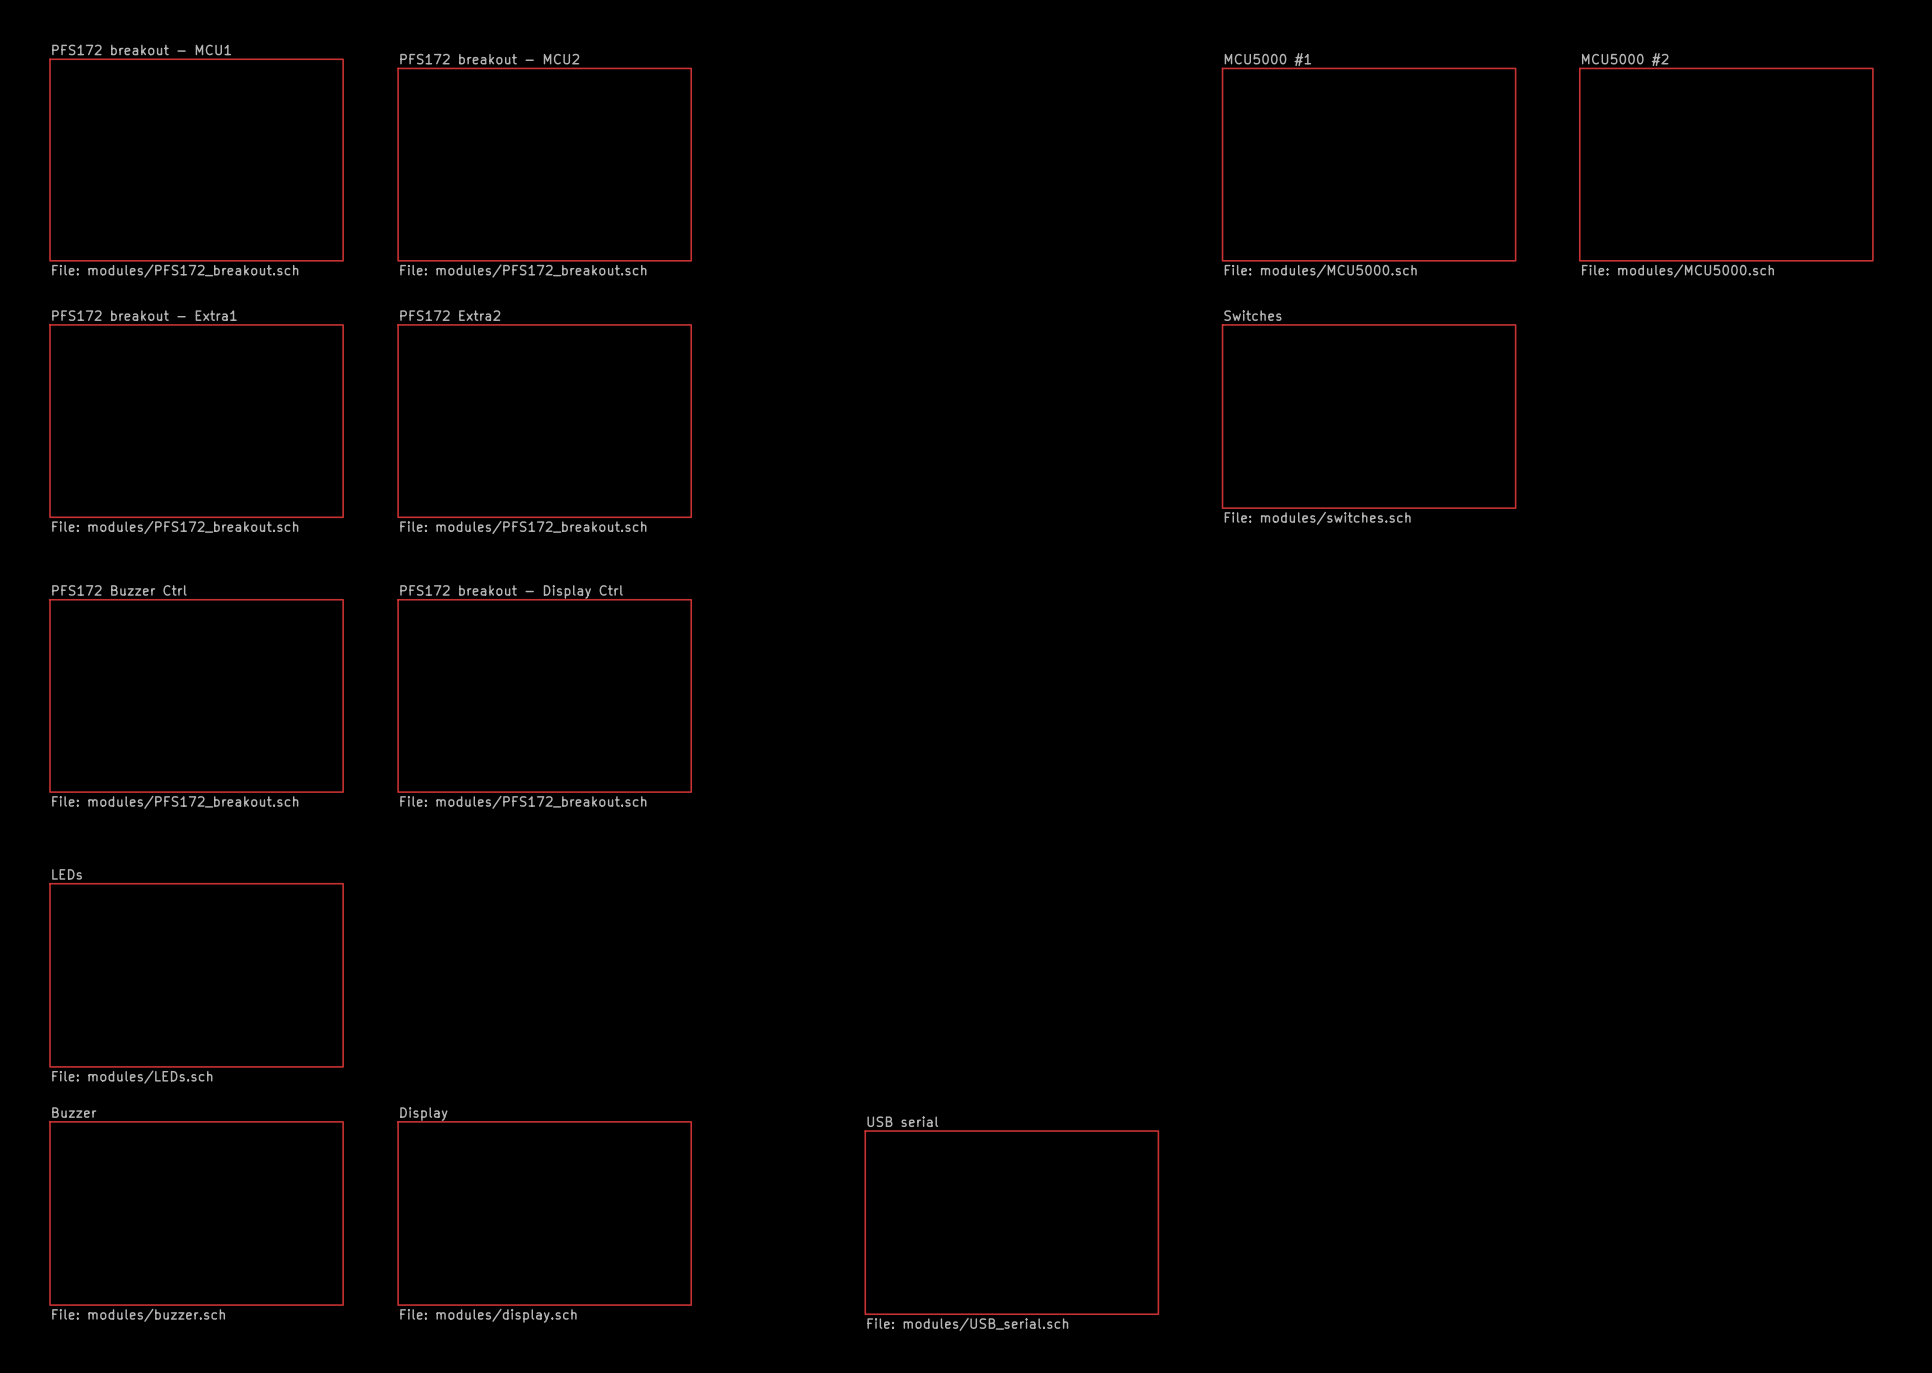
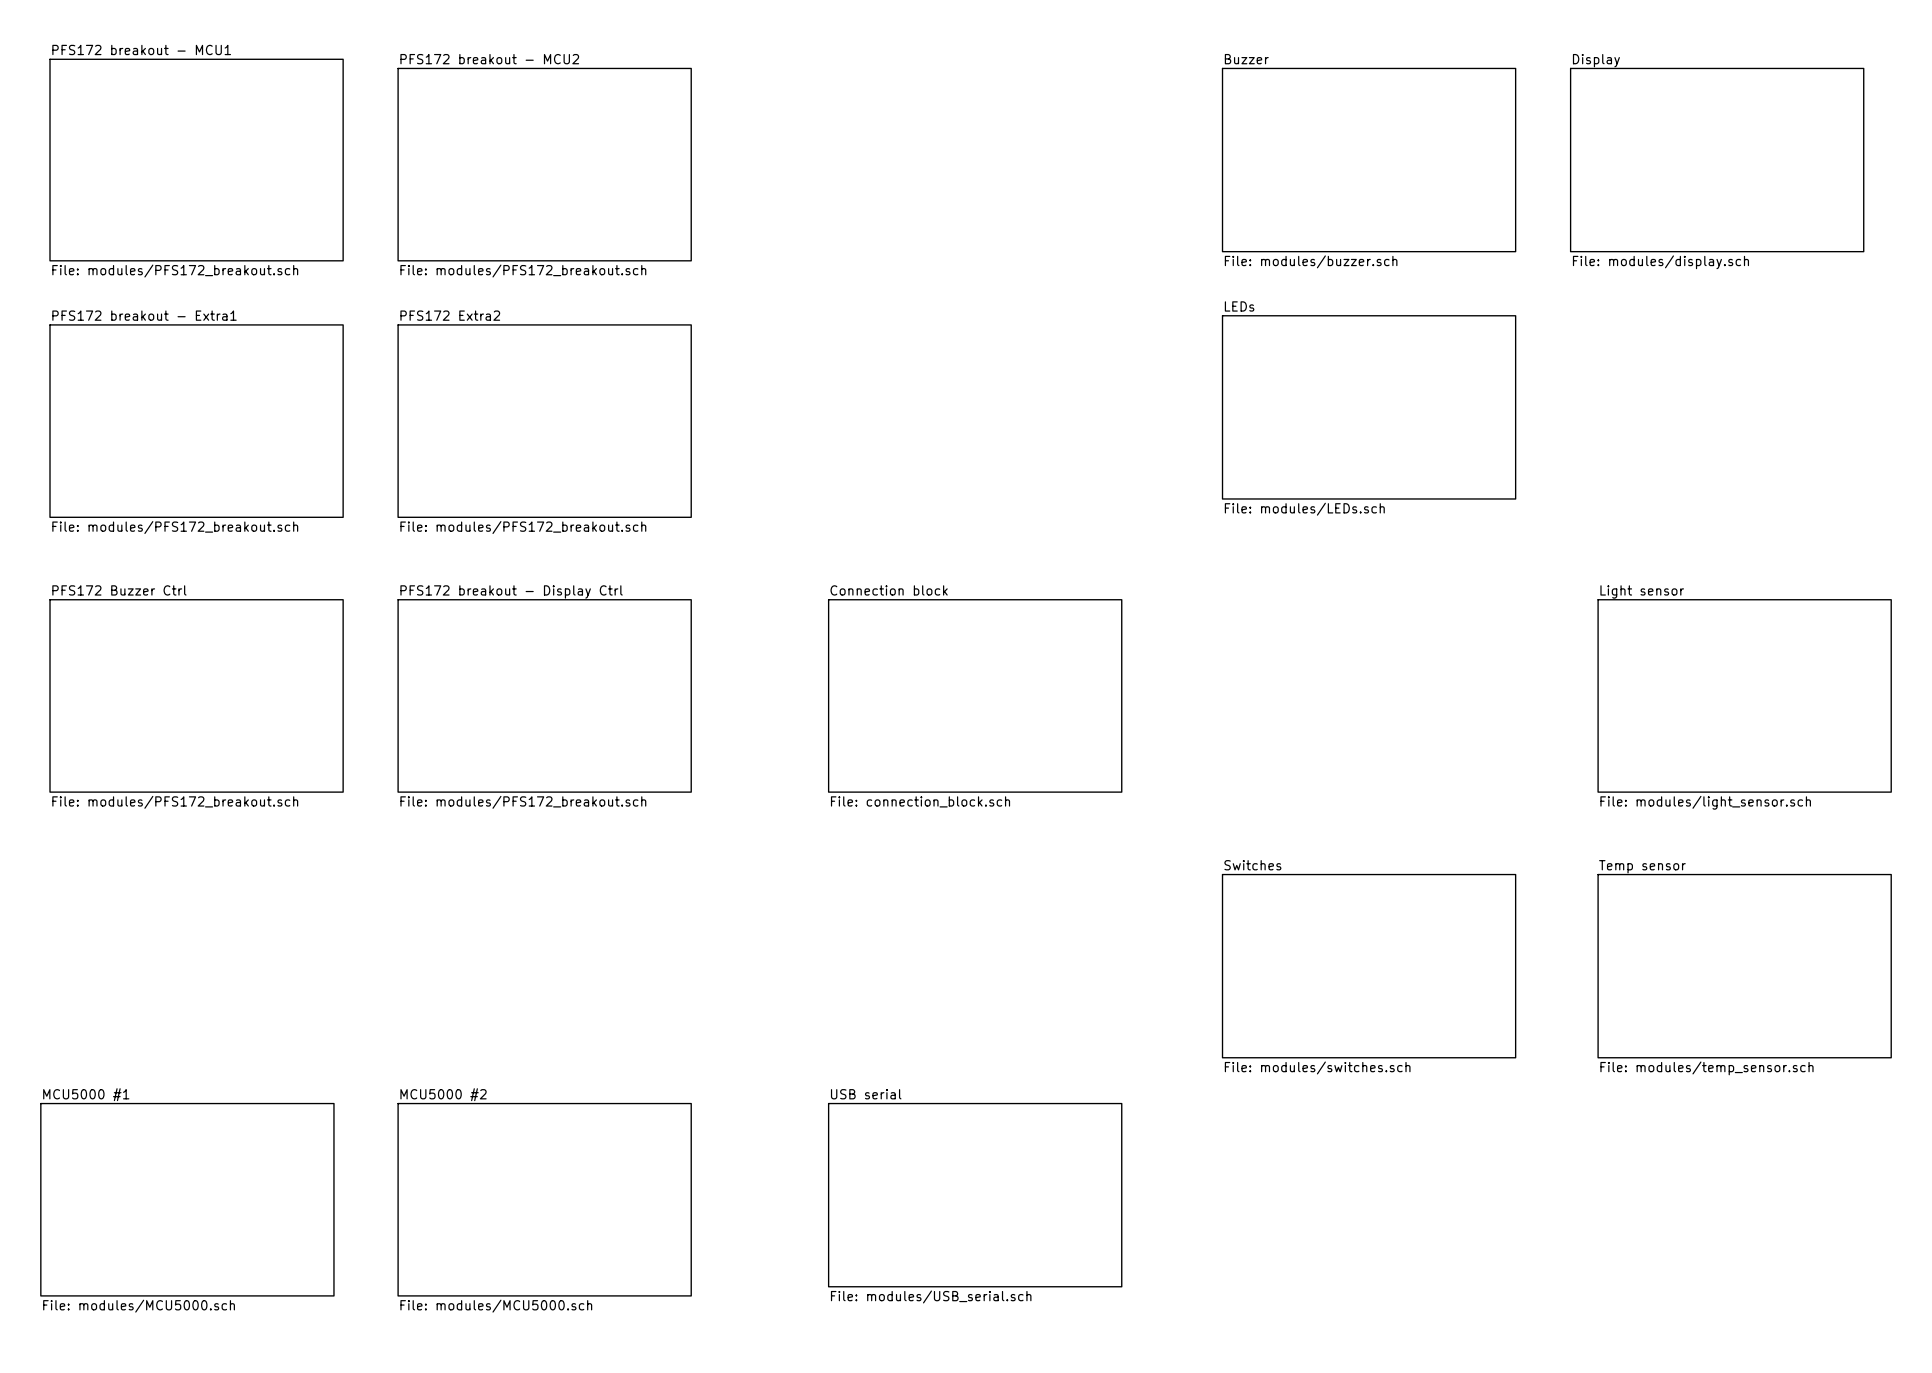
sheet Buzzer: none -> File: modules/buzzer.sch (1369, 160)
sheet Display: none -> File: modules/display.sch (1717, 160)
sheet MCU5000 #1 position: (1369, 164) -> (187, 1199)
sheet MCU5000 #2 position: (1726, 164) -> (544, 1199)
sheet LEDs: none -> File: modules/LEDs.sch (1369, 407)
sheet Switches: File: modules/switches.sch (1369, 416) -> none
sheet Connection block: none -> File: connection_block.sch (975, 695)
sheet Light sensor: none -> File: modules/light_sensor.sch (1744, 695)
sheet Switches: none -> File: modules/switches.sch (1369, 966)
sheet Temp sensor: none -> File: modules/temp_sensor.sch (1744, 966)
sheet LEDs: File: modules/LEDs.sch (196, 975) -> none
sheet Buzzer: File: modules/buzzer.sch (196, 1213) -> none
sheet Display: File: modules/display.sch (544, 1213) -> none
sheet USB serial position: (1011, 1222) -> (975, 1195)

